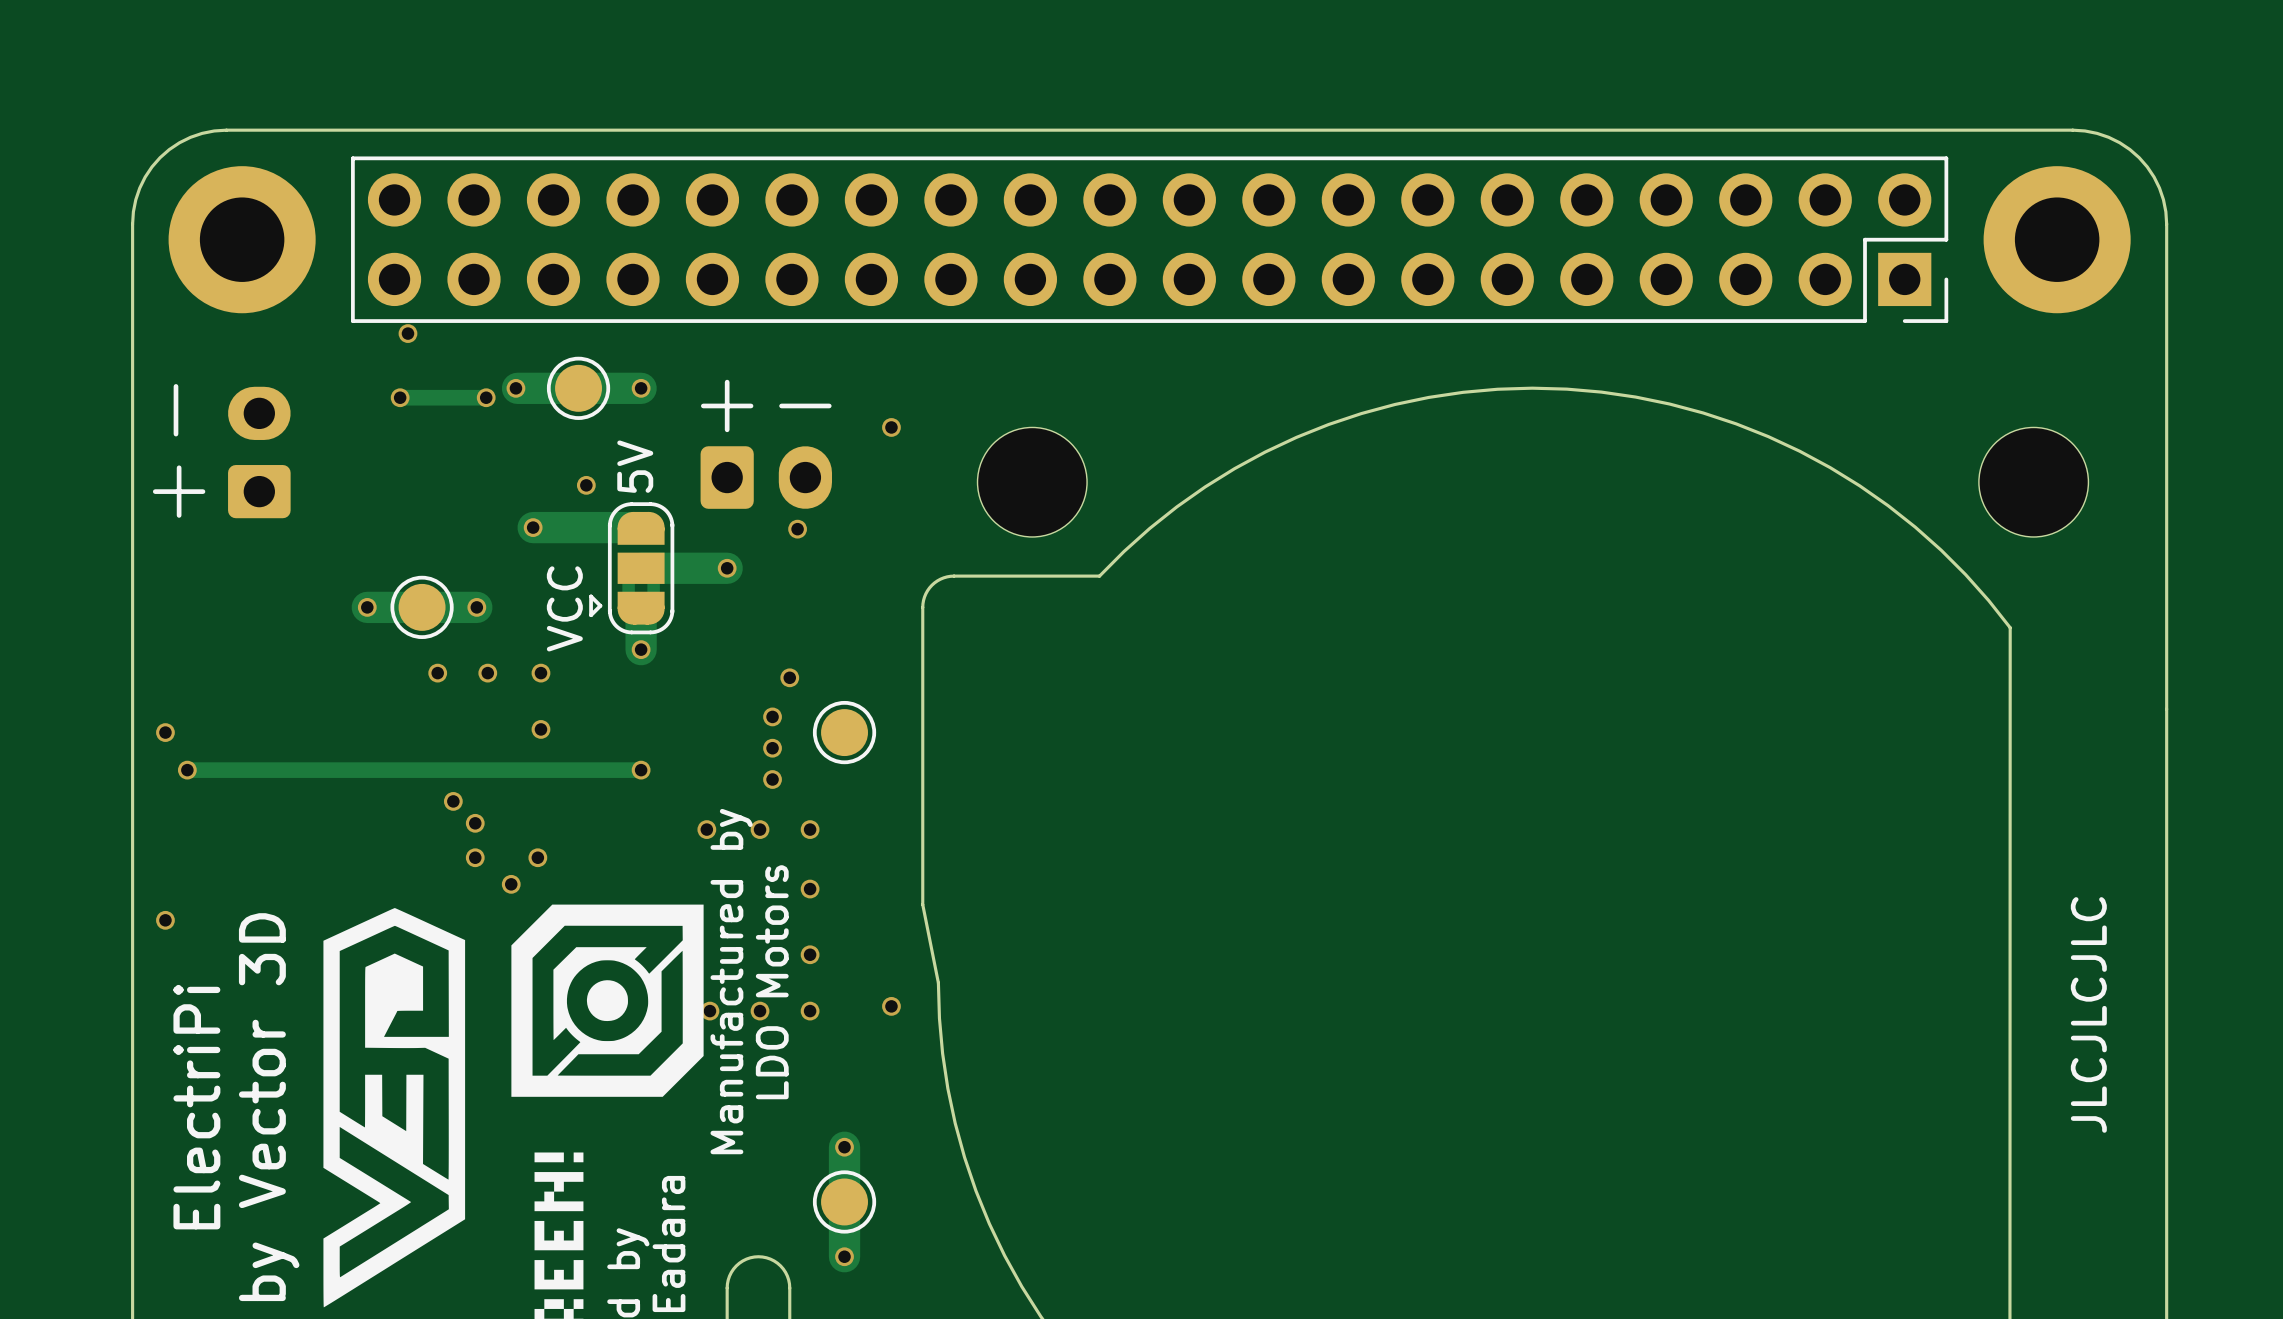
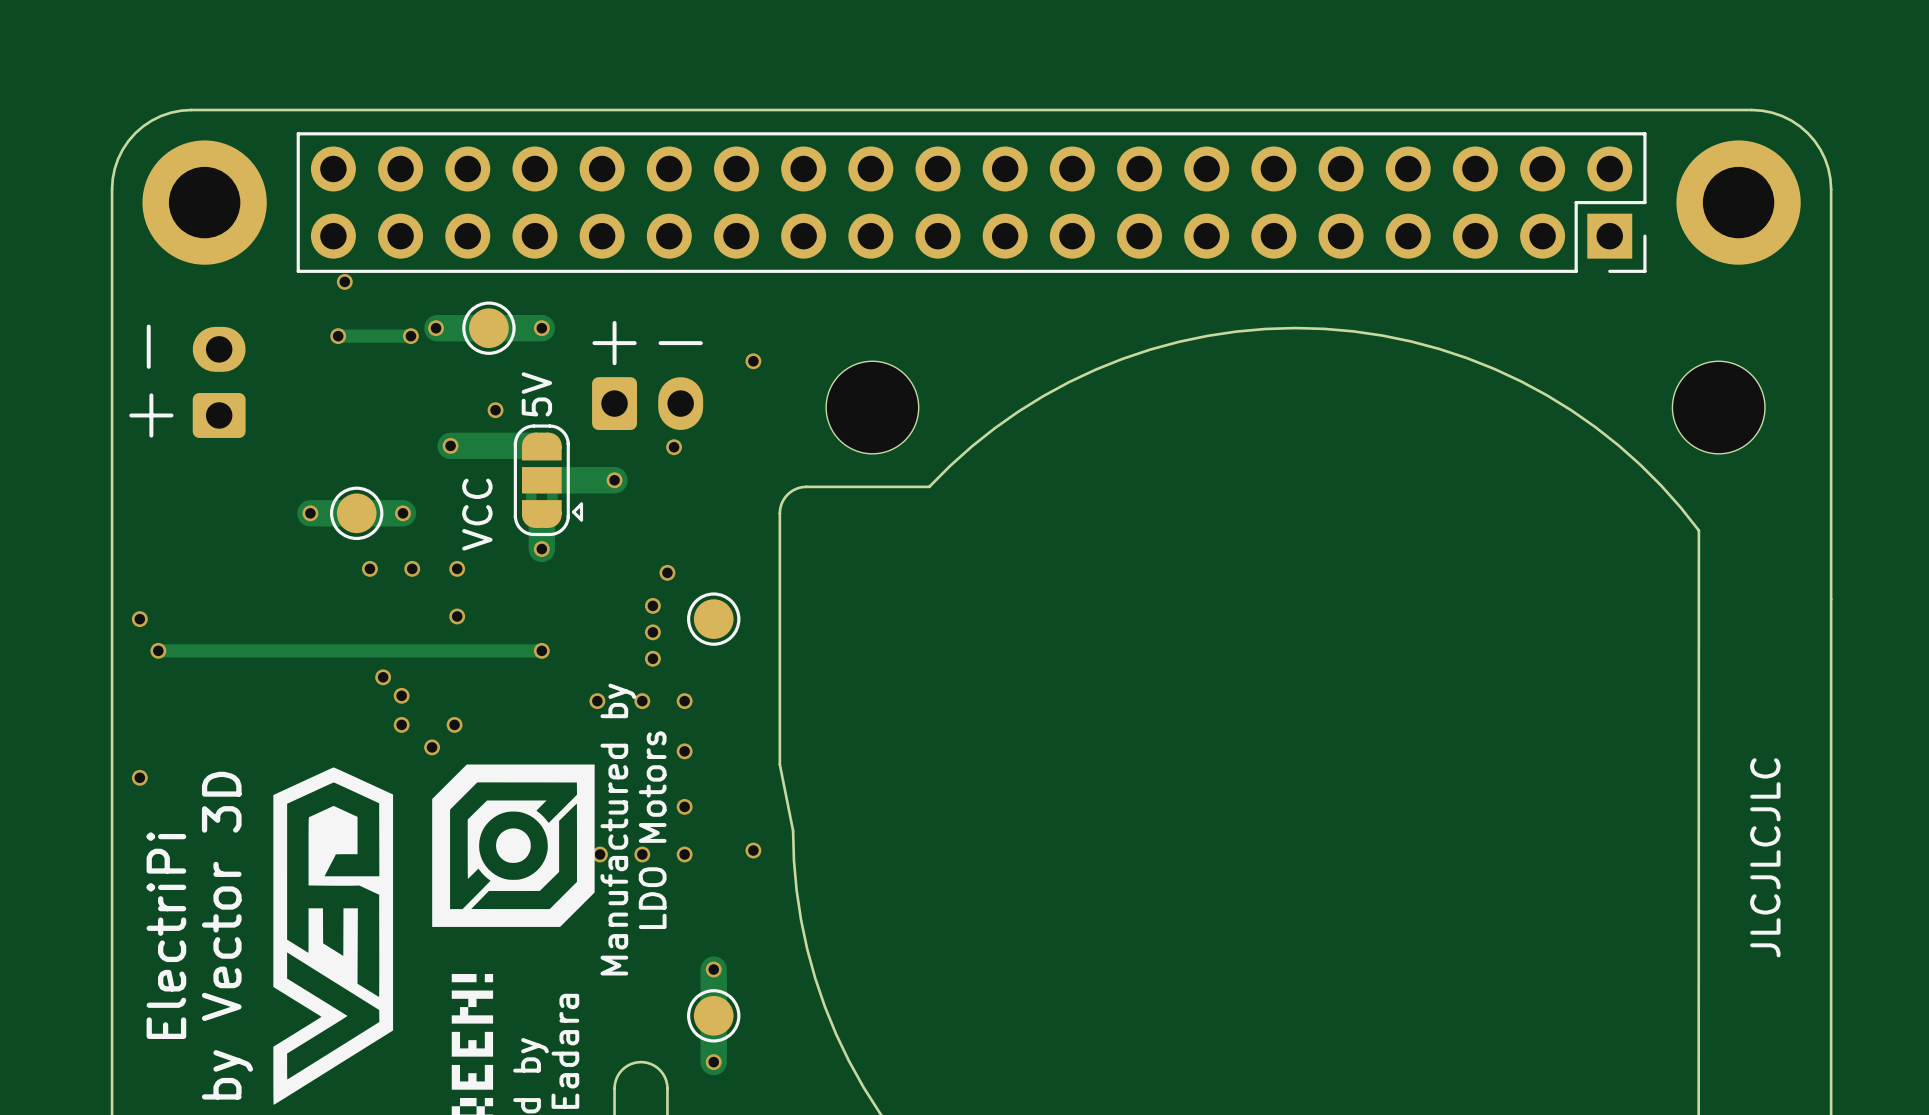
part footprint: [589, 502, 675, 635] -> [513, 424, 584, 537]

